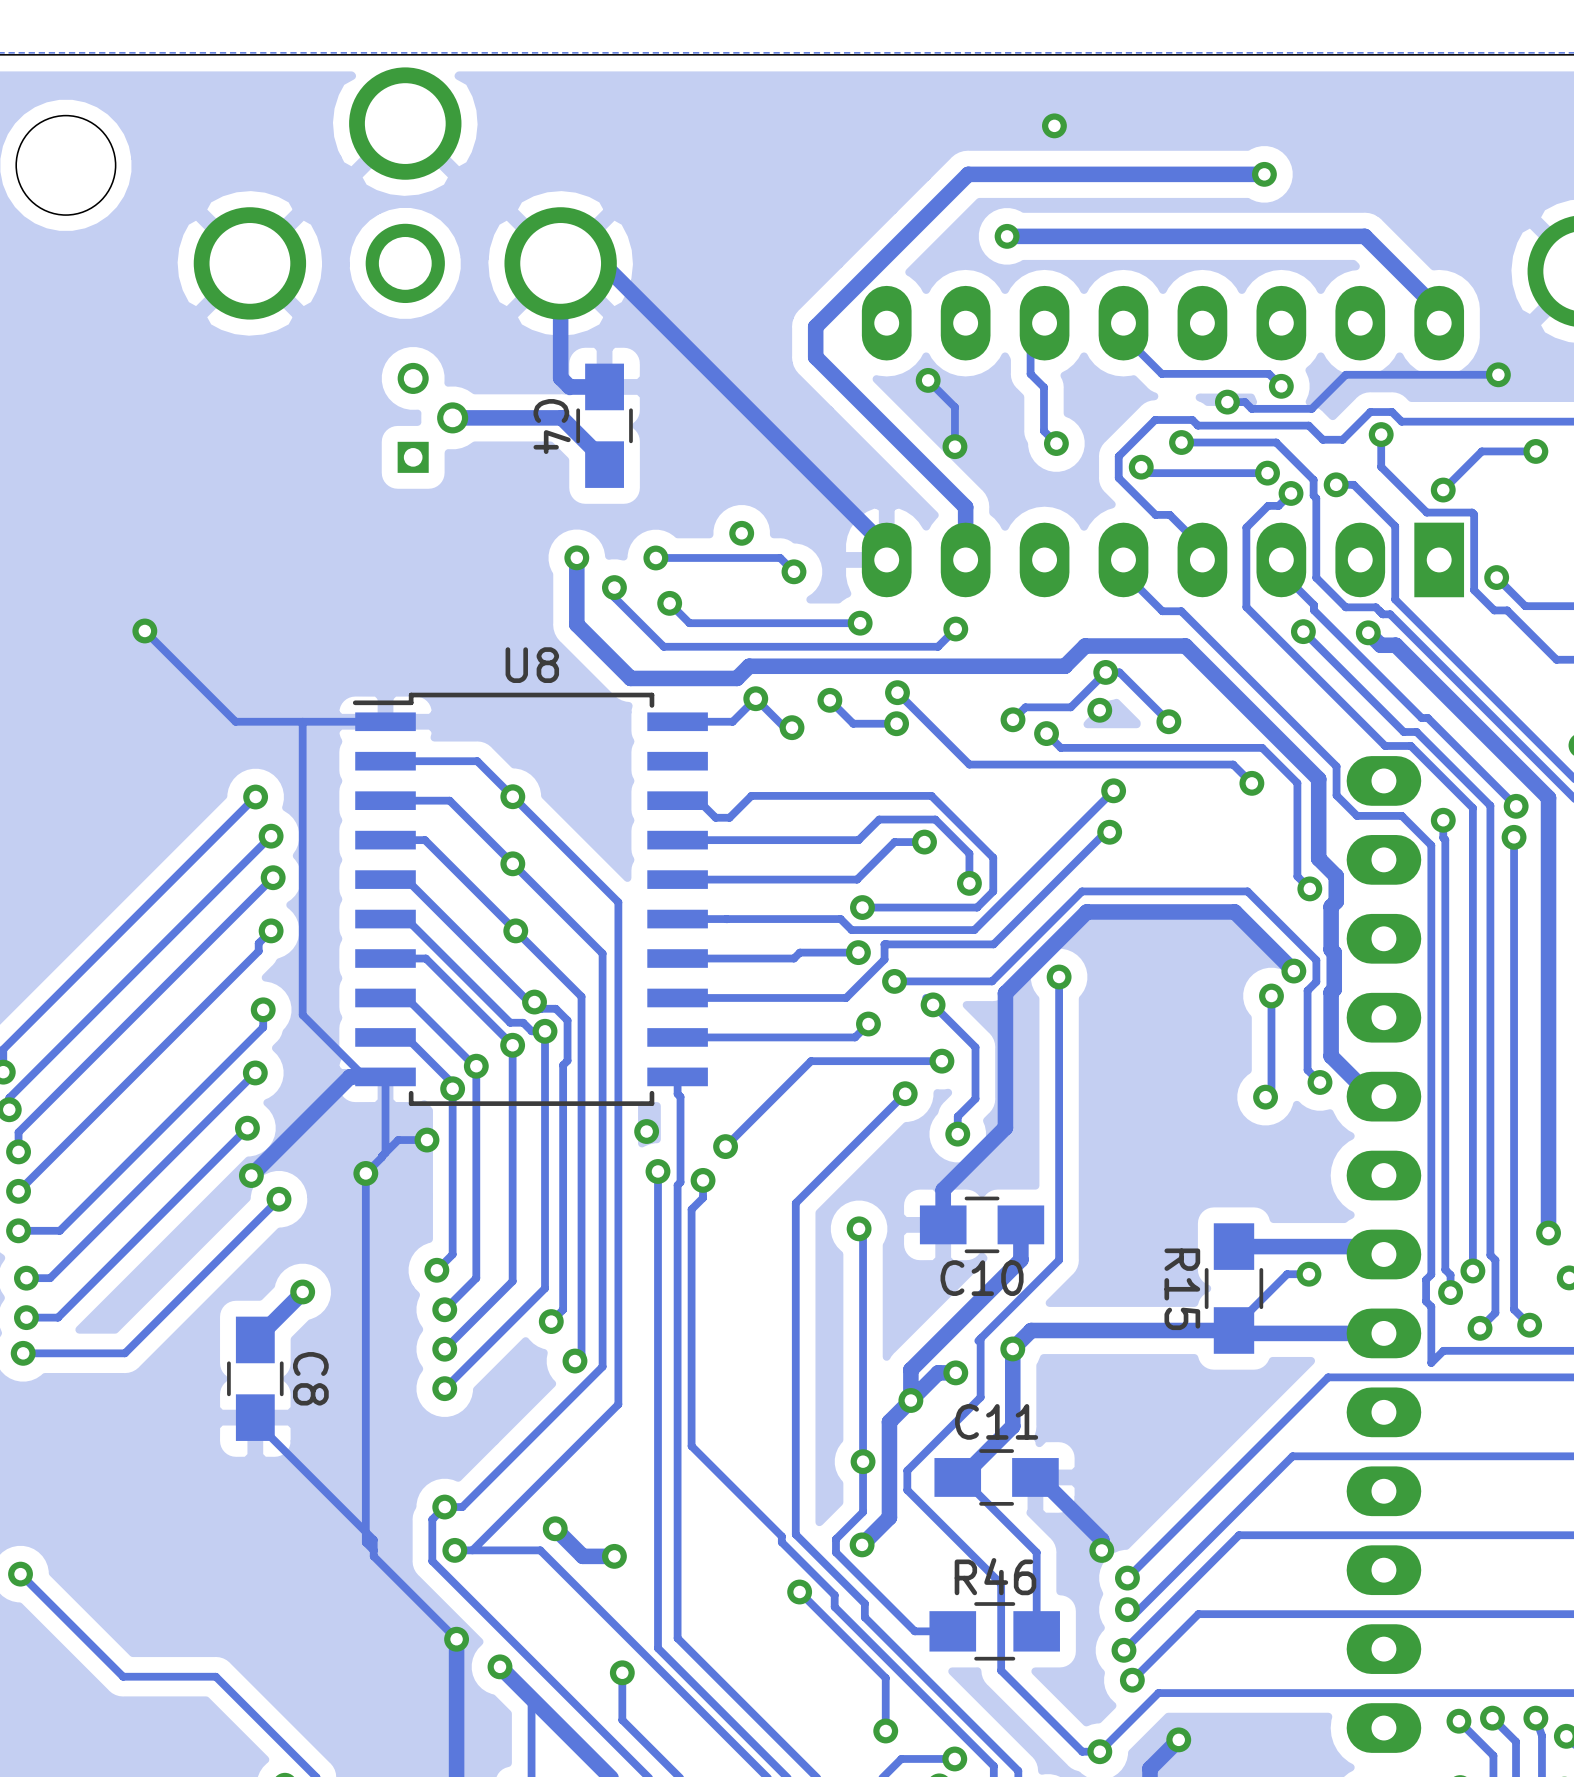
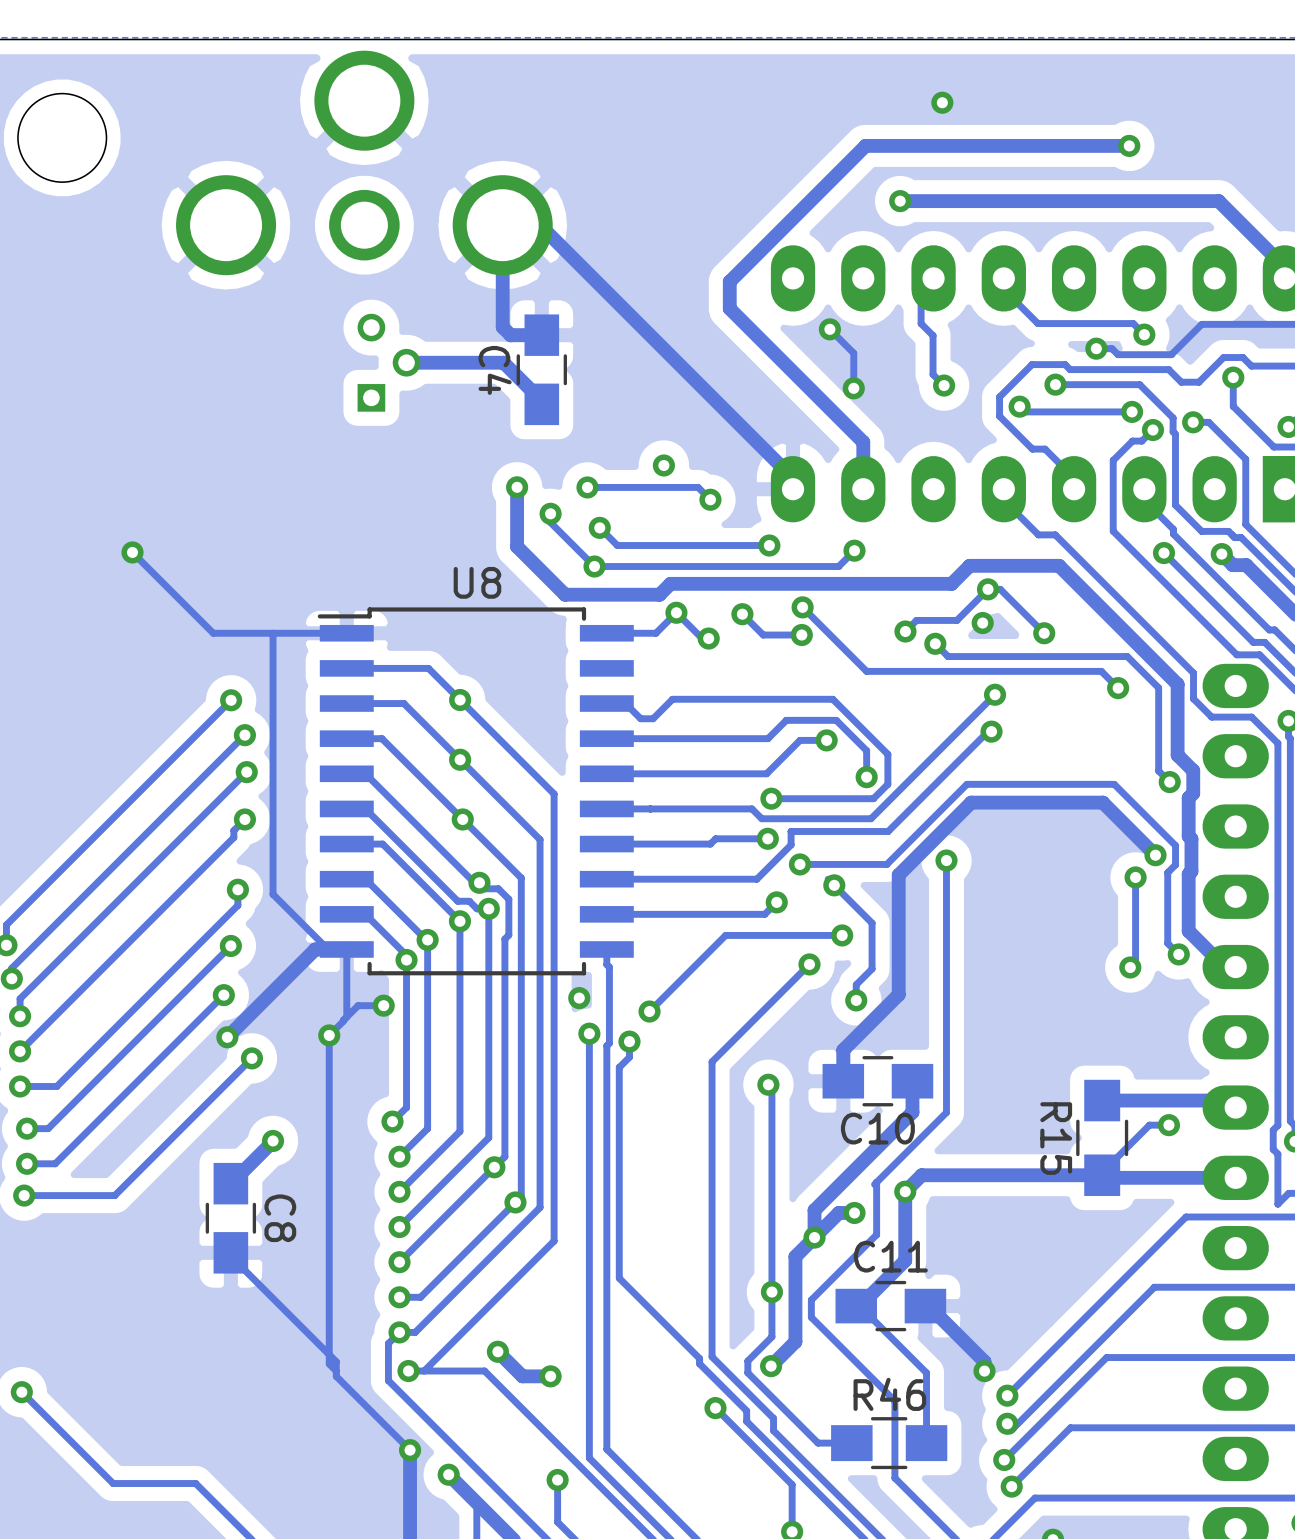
via: none -> (594, 566)
track: none -> (494, 1167) (399, 1262)
track: none -> (515, 1202) (420, 1297) (399, 1297)
via: none -> (399, 1262)
via: none -> (399, 1297)

